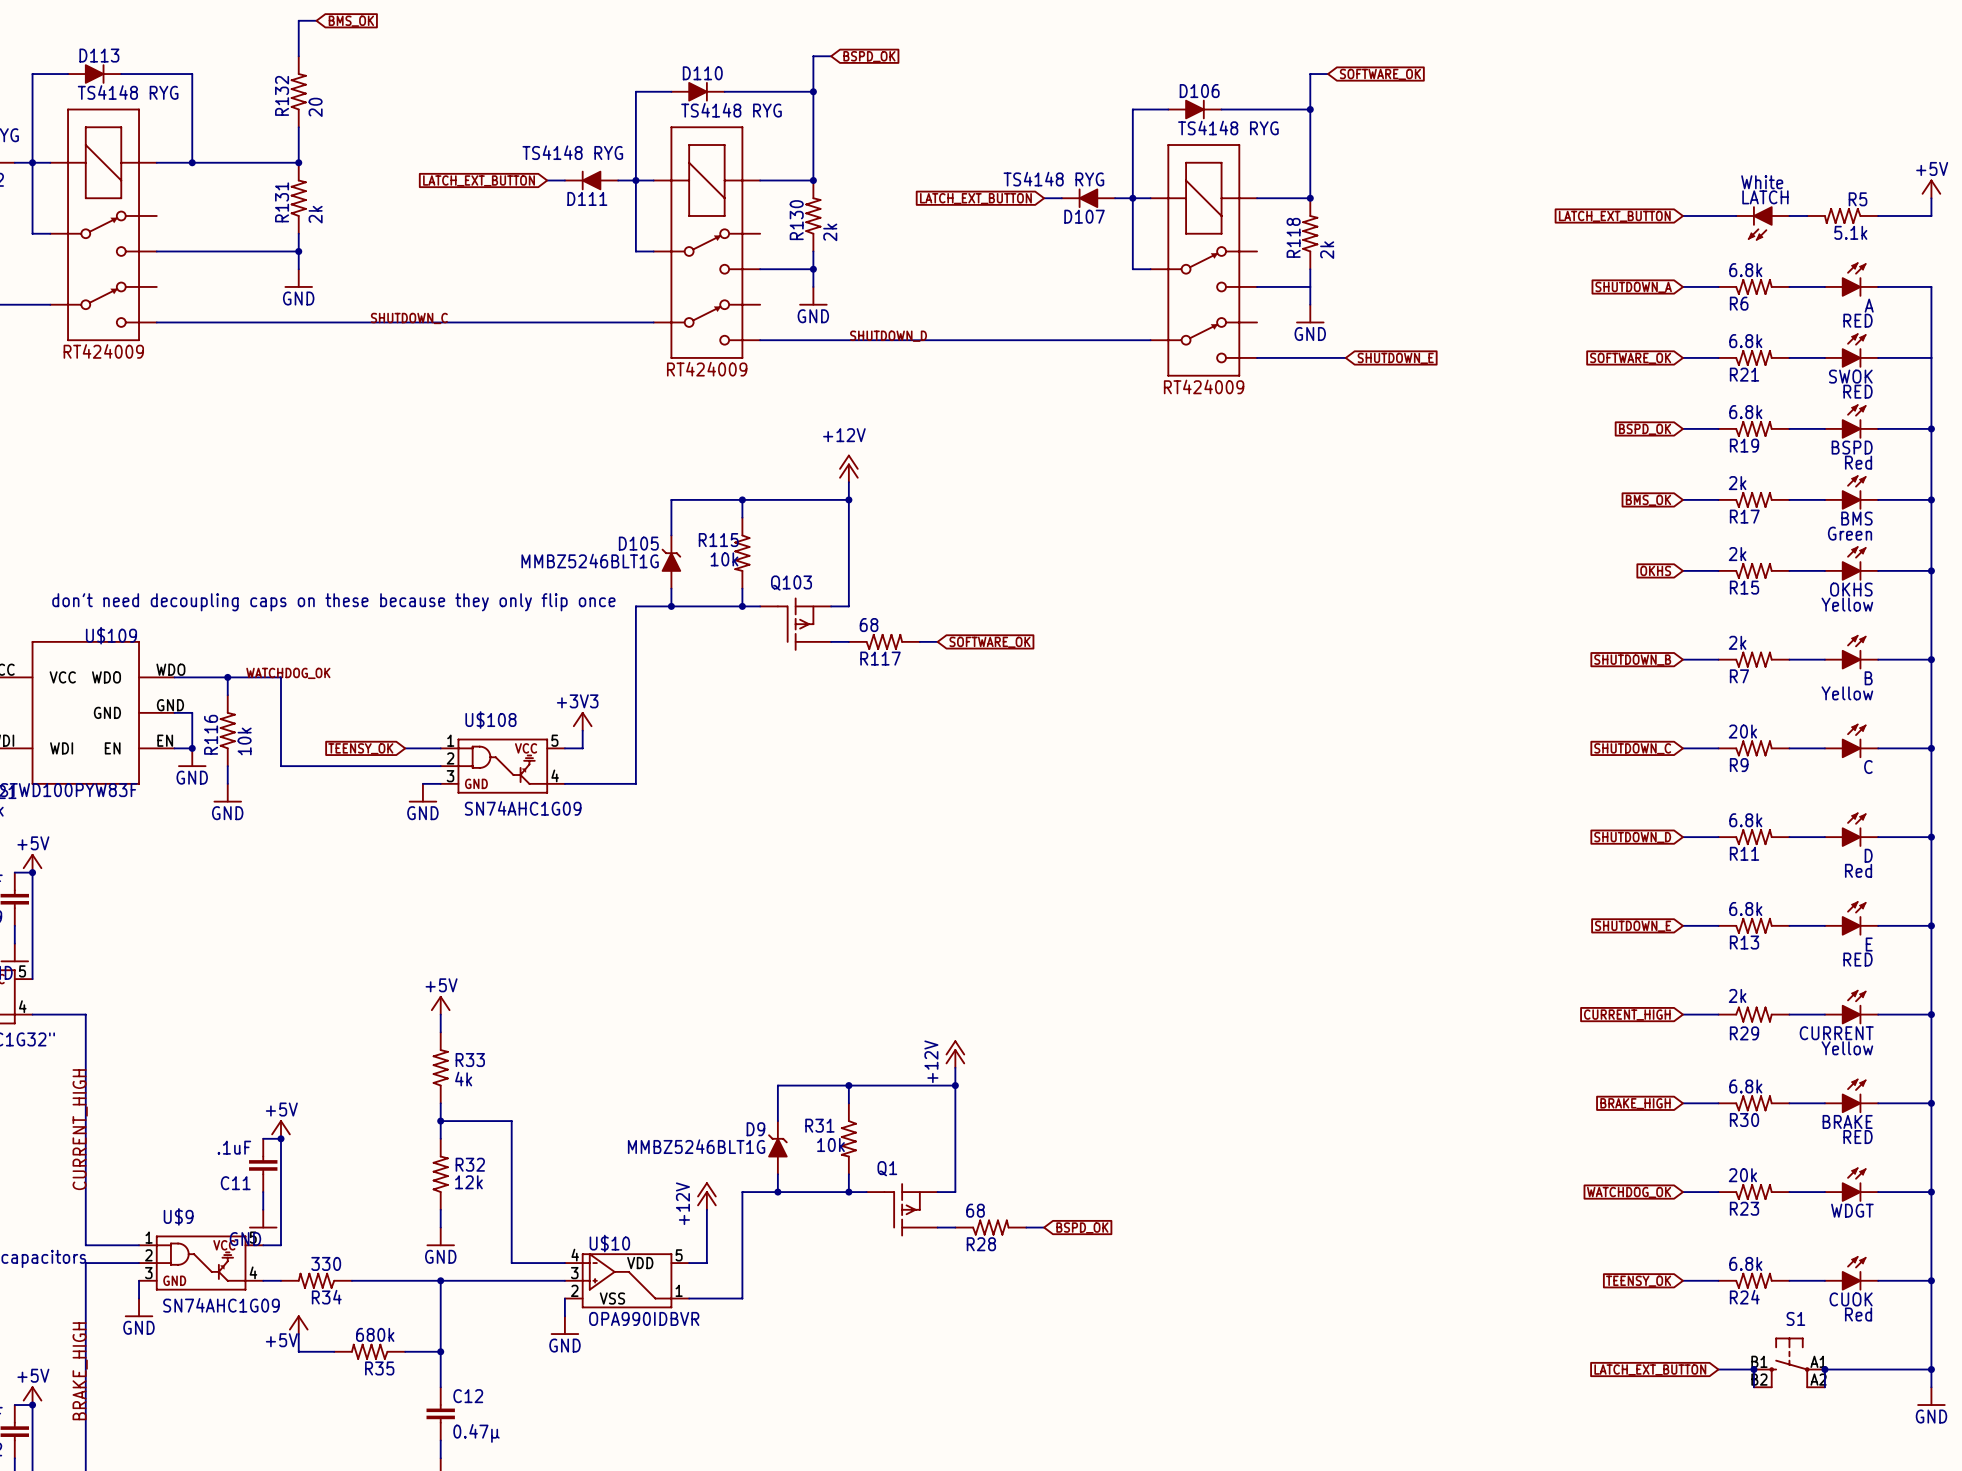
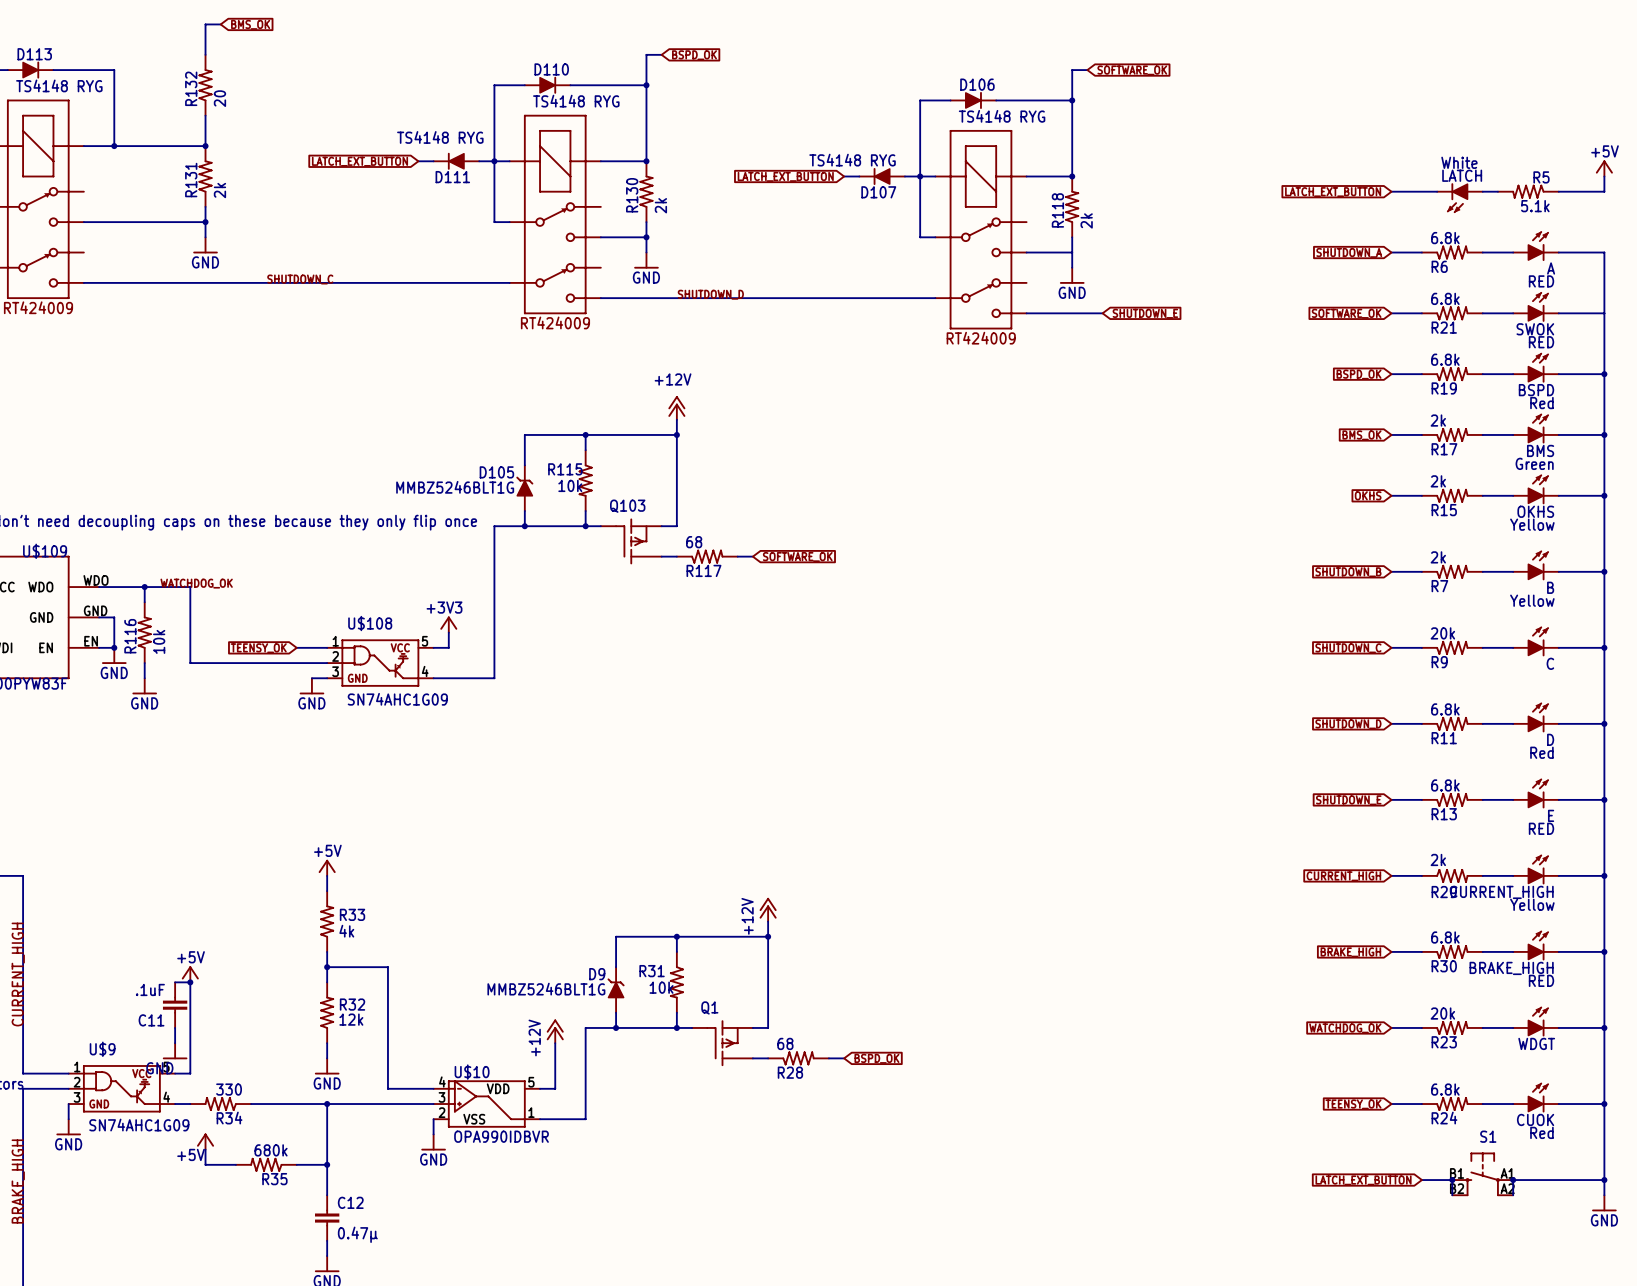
CURRENT name: CURRENT (1836, 1033) -> CURRENT_HIGH (1501, 892)
BRAKE name: BRAKE (1847, 1121) -> BRAKE_HIGH (1511, 968)

